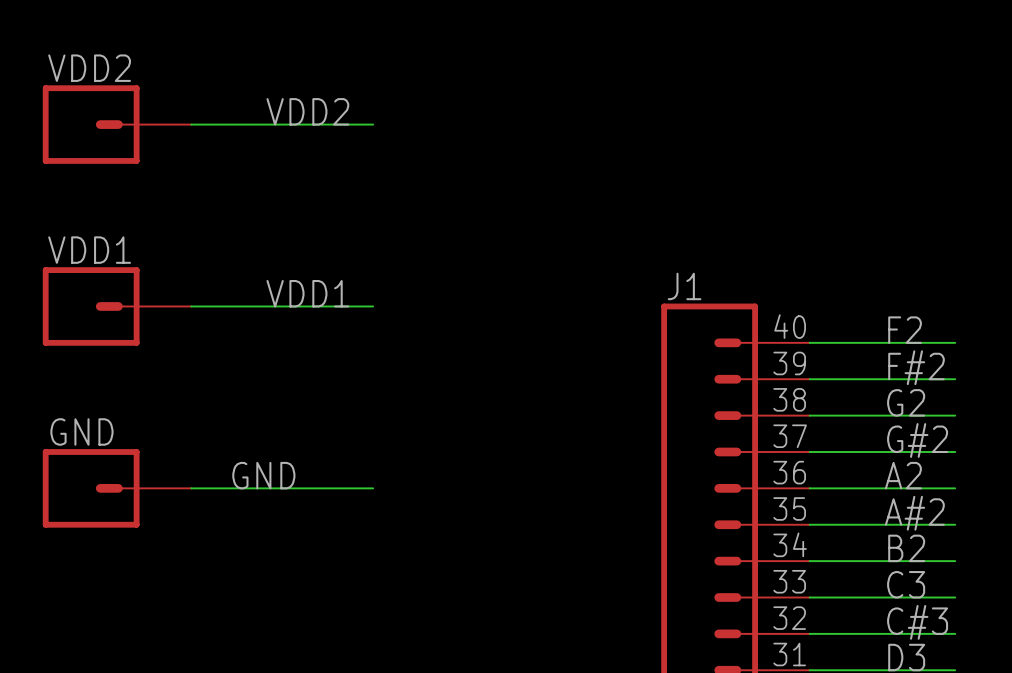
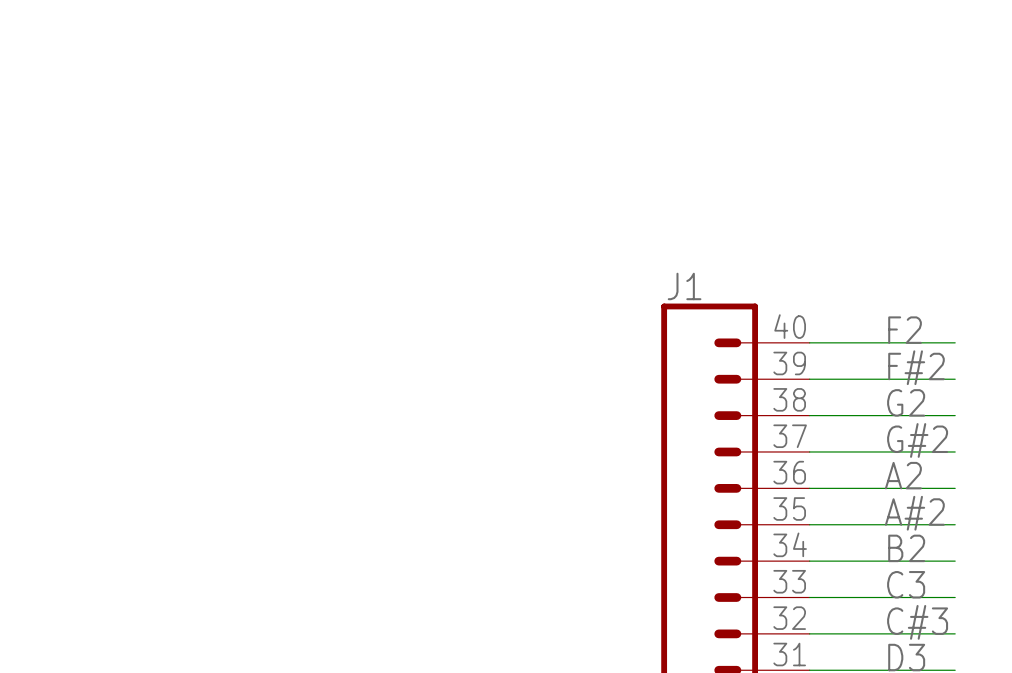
label: VDD2 (307, 111) -> none
VDD2: (116, 124) -> none
wire: (191, 124) (373, 124) -> none
label: VDD1 (307, 293) -> none
VDD1: (116, 306) -> none
wire: (191, 306) (373, 306) -> none
label: GND (263, 475) -> none
GND: (116, 488) -> none
wire: (191, 488) (373, 488) -> none

